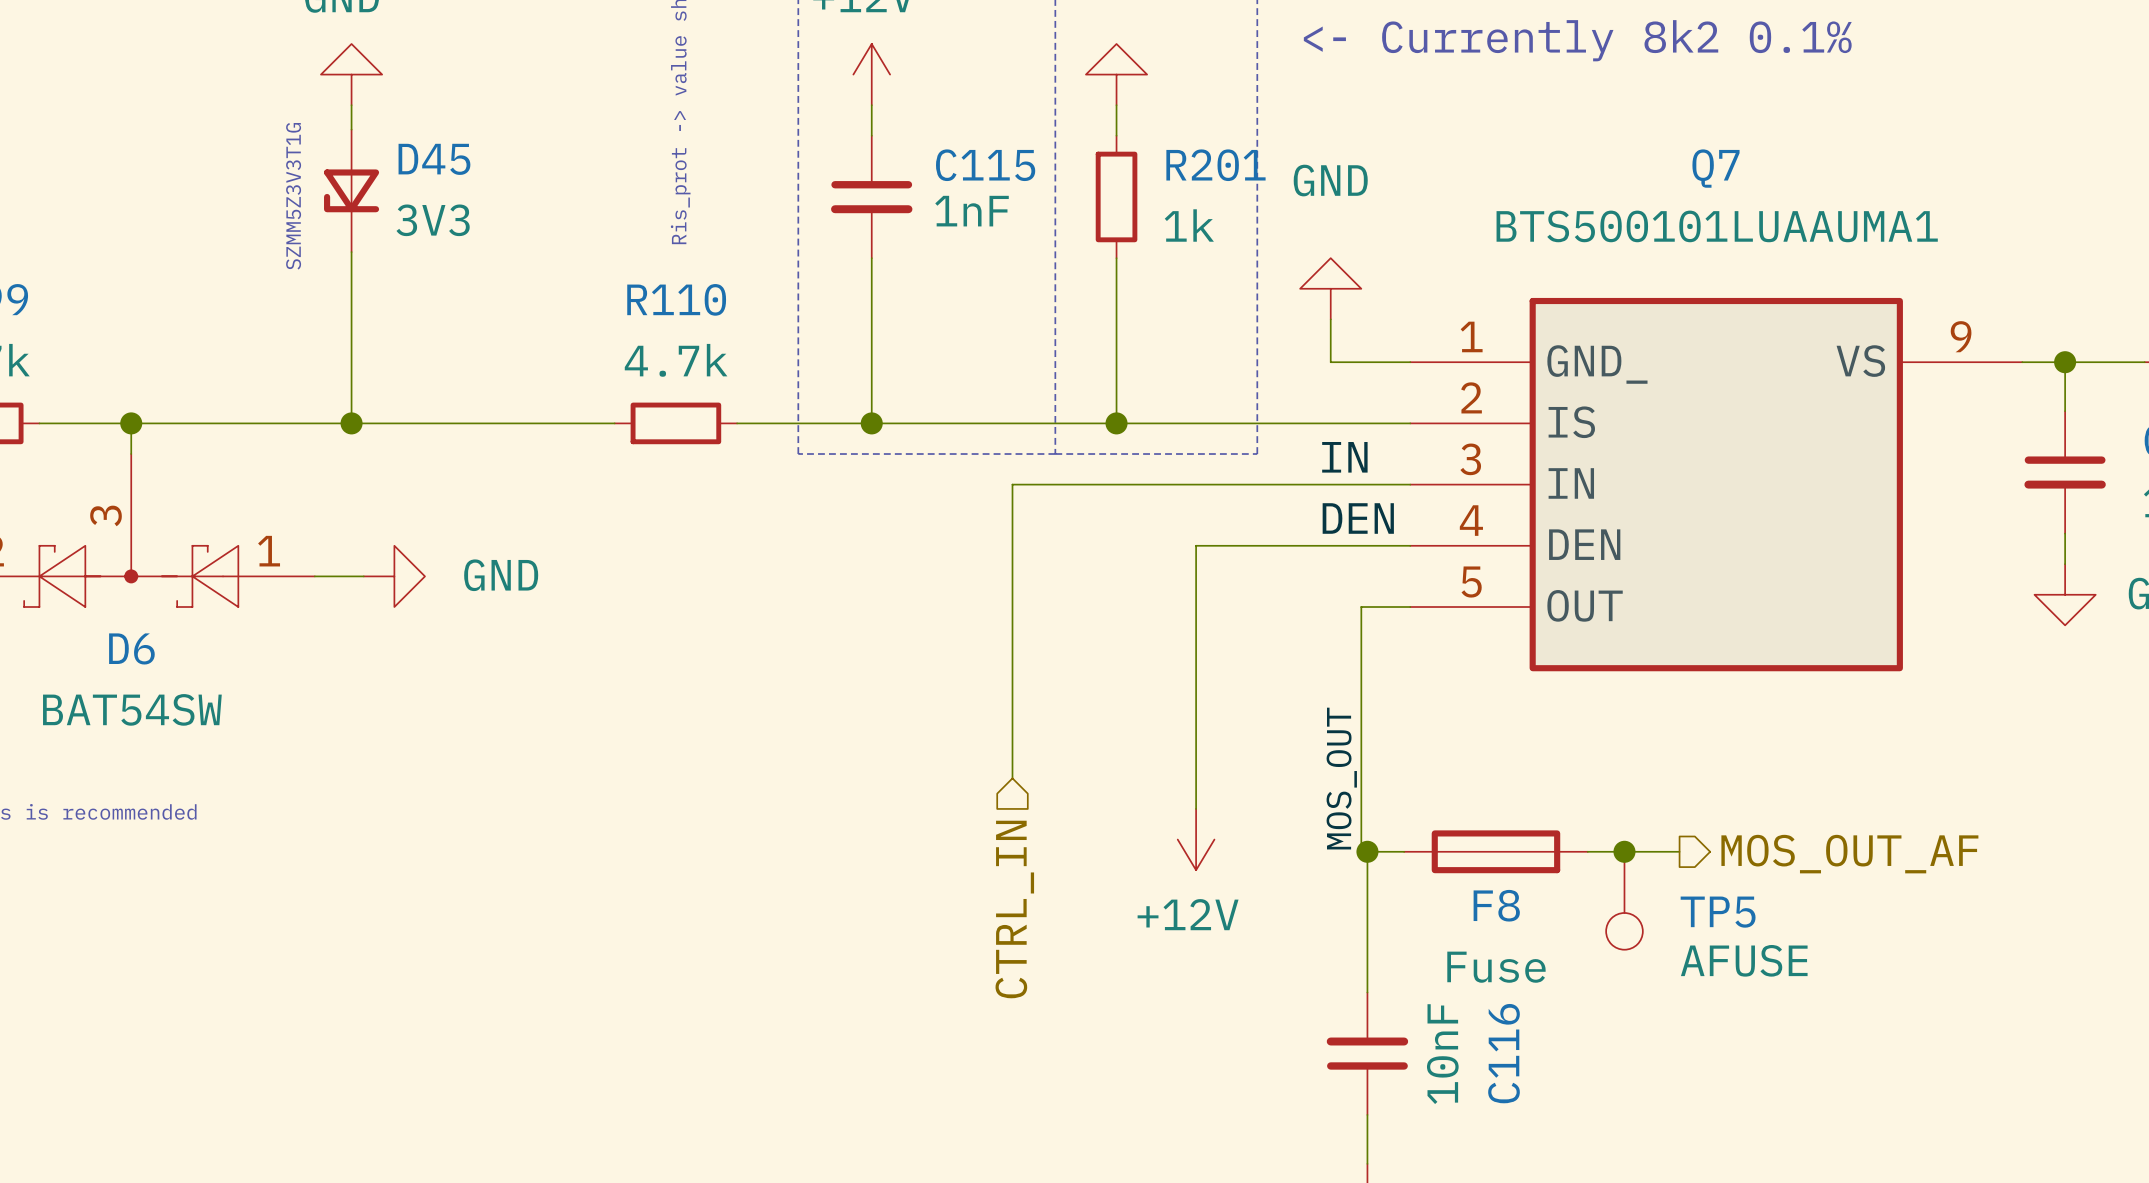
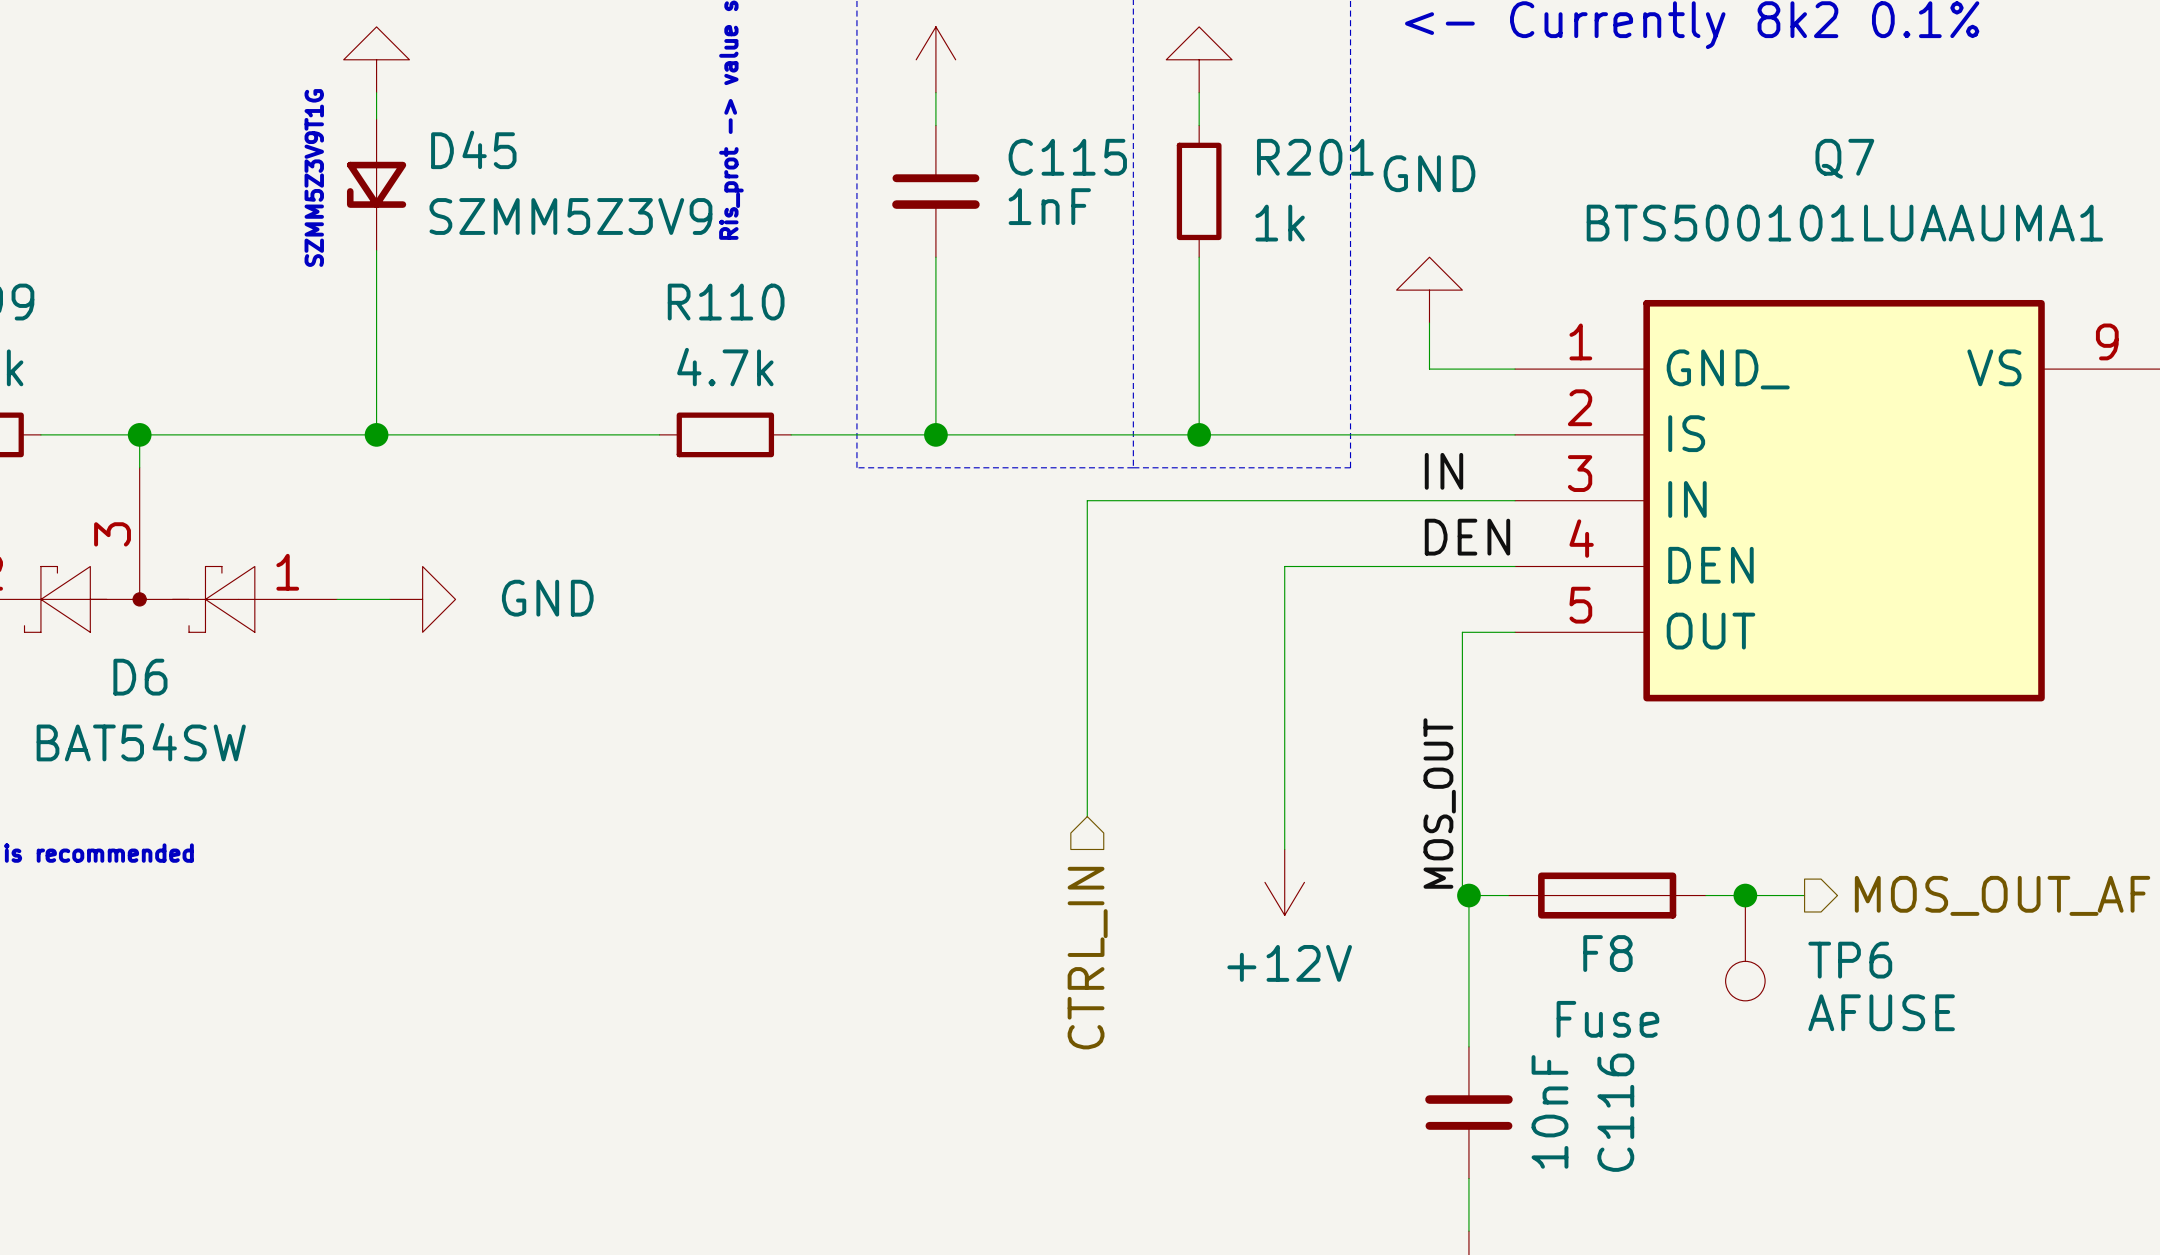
text: SZMM5Z3V3T1G (293, 196) -> SZMM5Z3V9T1G (314, 177)
D45 value: 3V3 (433, 220) -> SZMM5Z3V9 (570, 216)
TP5 name: TP5 (1718, 912) -> TP6 (1850, 960)

